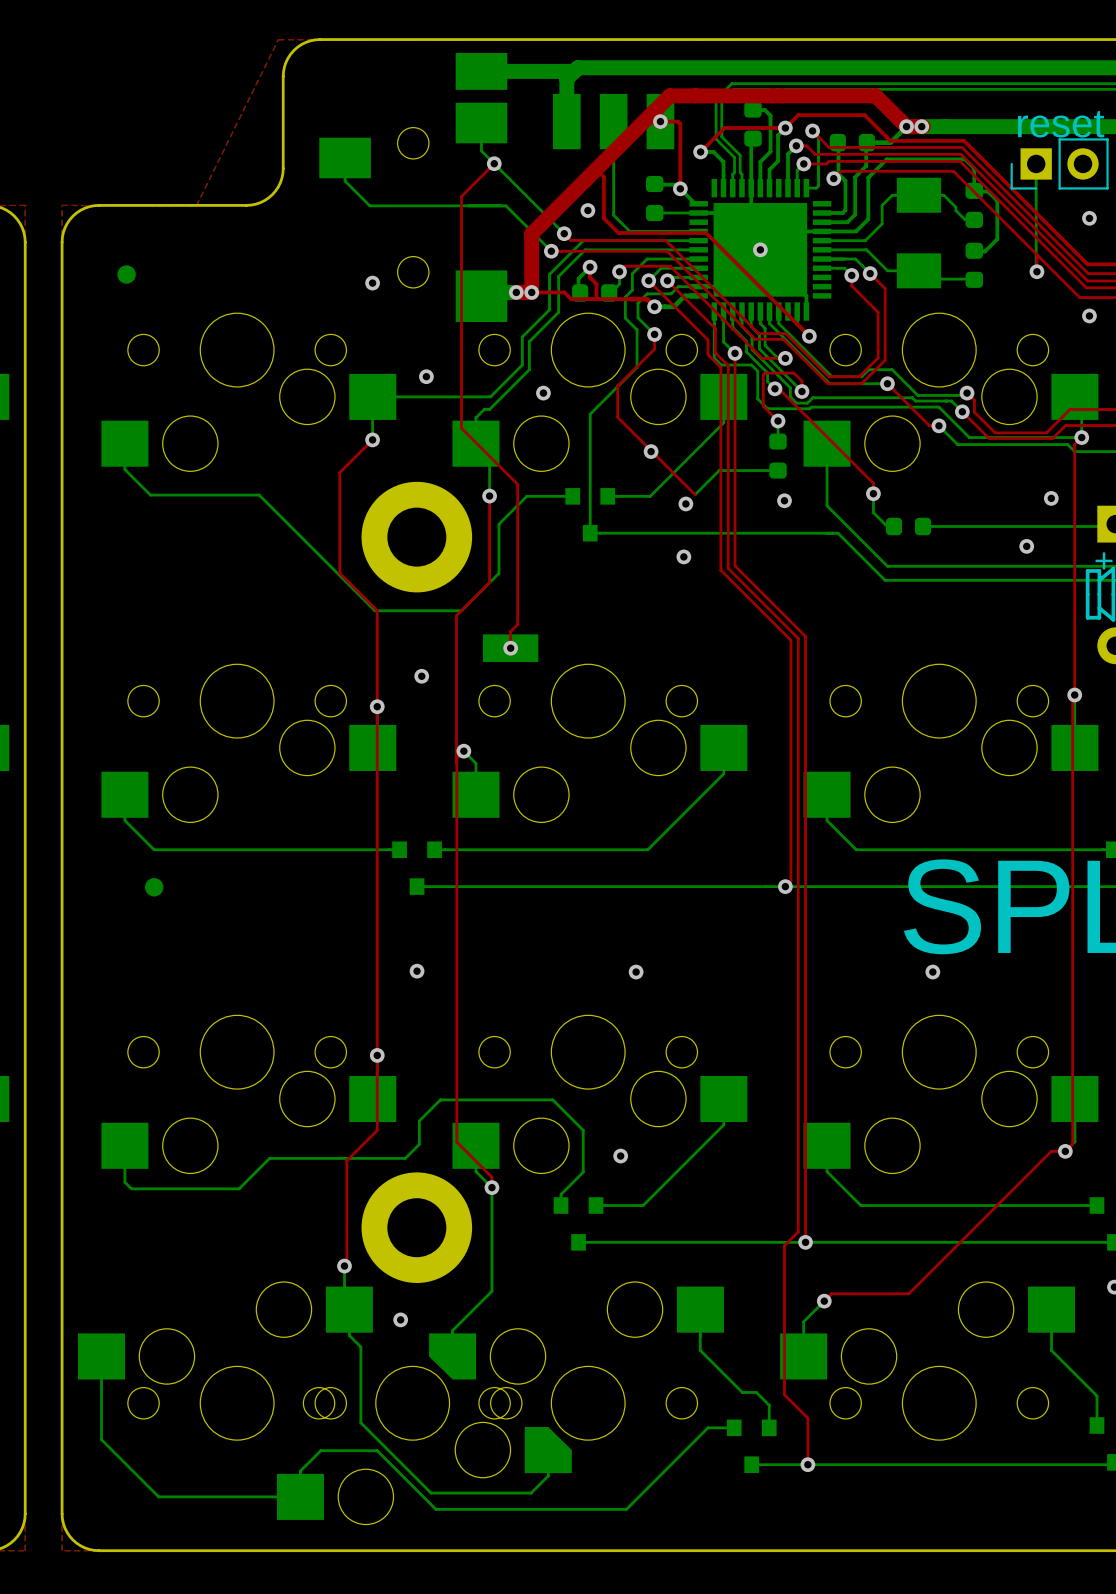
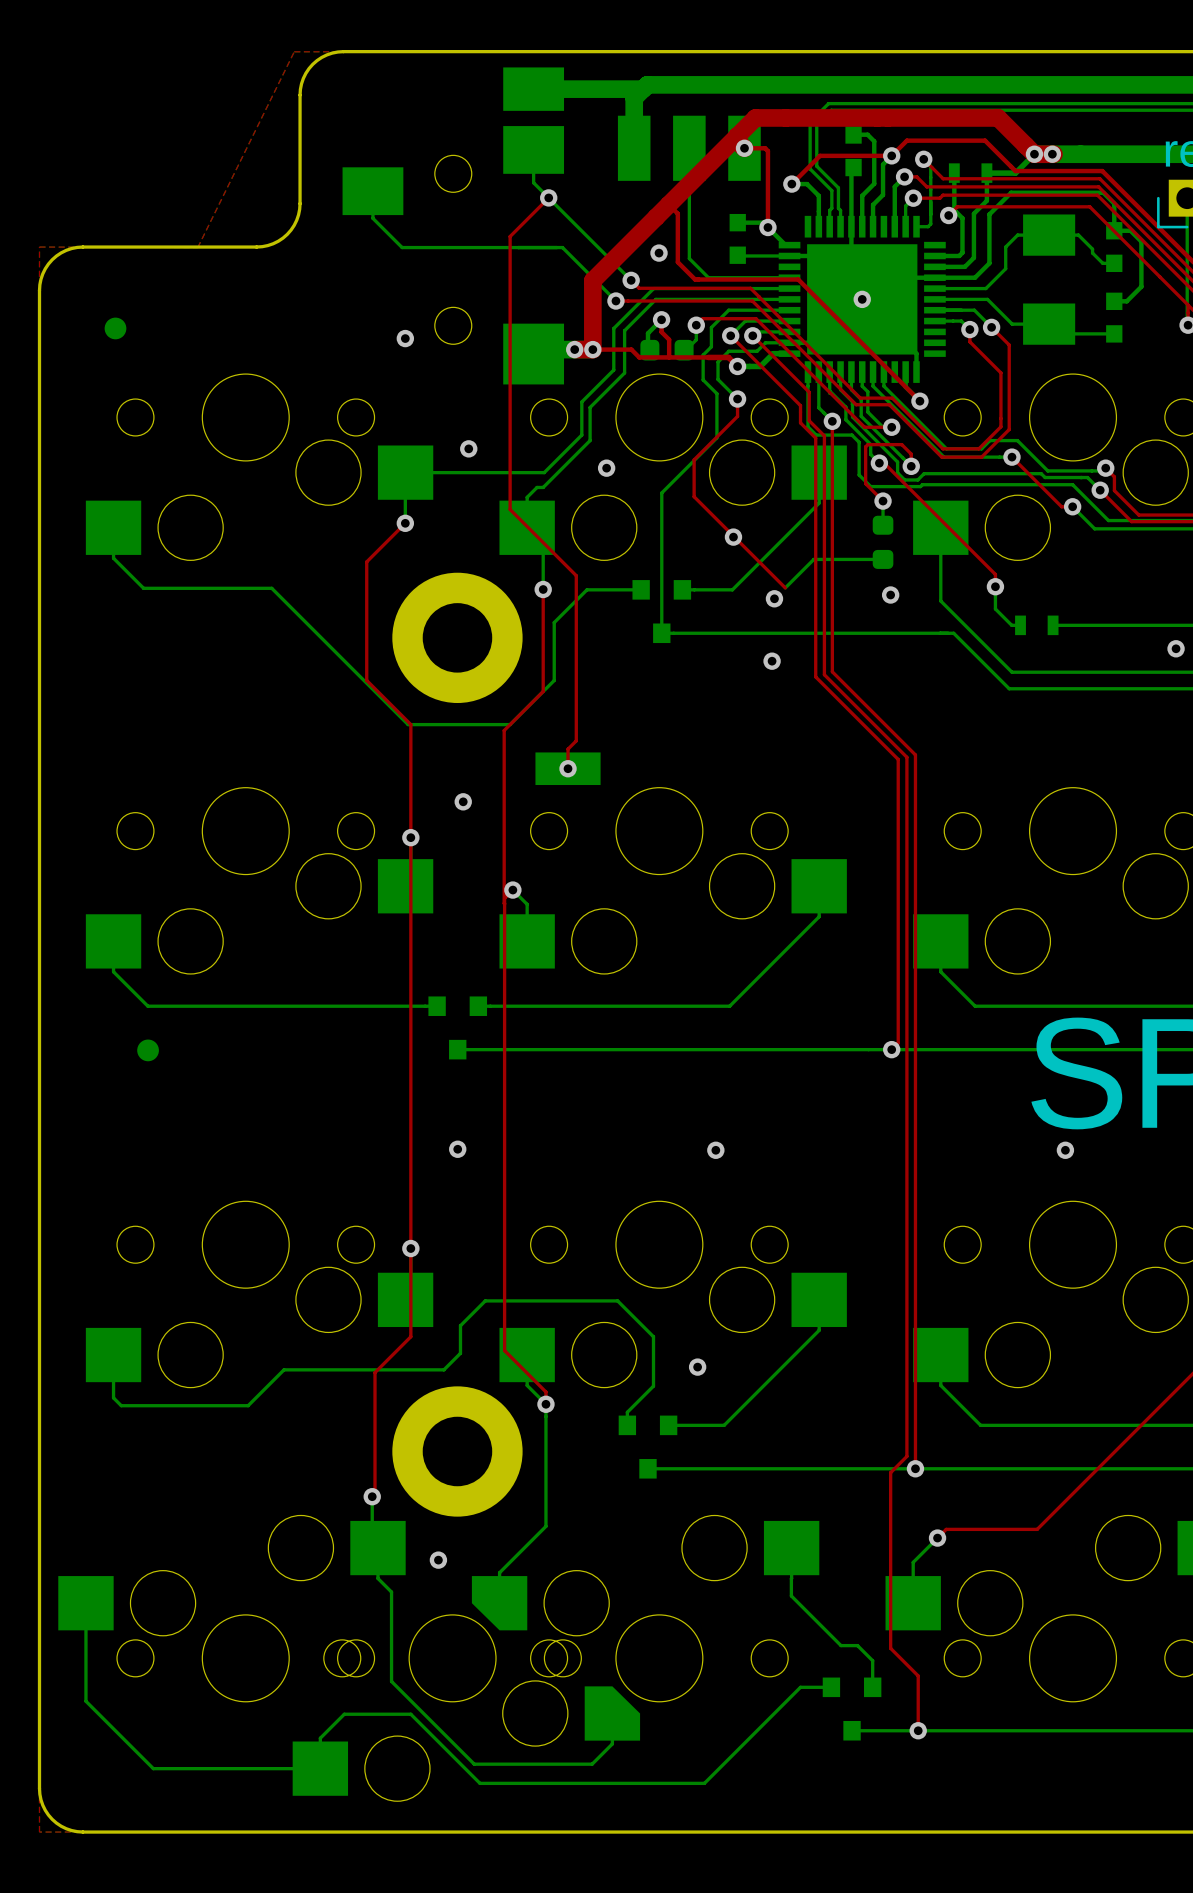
part footprint: [744, 101, 762, 147] -> [845, 126, 862, 177]
part footprint: [829, 133, 875, 152] -> [948, 163, 993, 183]
part footprint: [645, 175, 664, 222] -> [729, 213, 746, 264]
part footprint: [965, 182, 984, 228] -> [1106, 222, 1123, 273]
part footprint: [965, 242, 984, 288] -> [1106, 292, 1123, 343]
part footprint: [885, 517, 932, 536] -> [1015, 615, 1059, 636]

